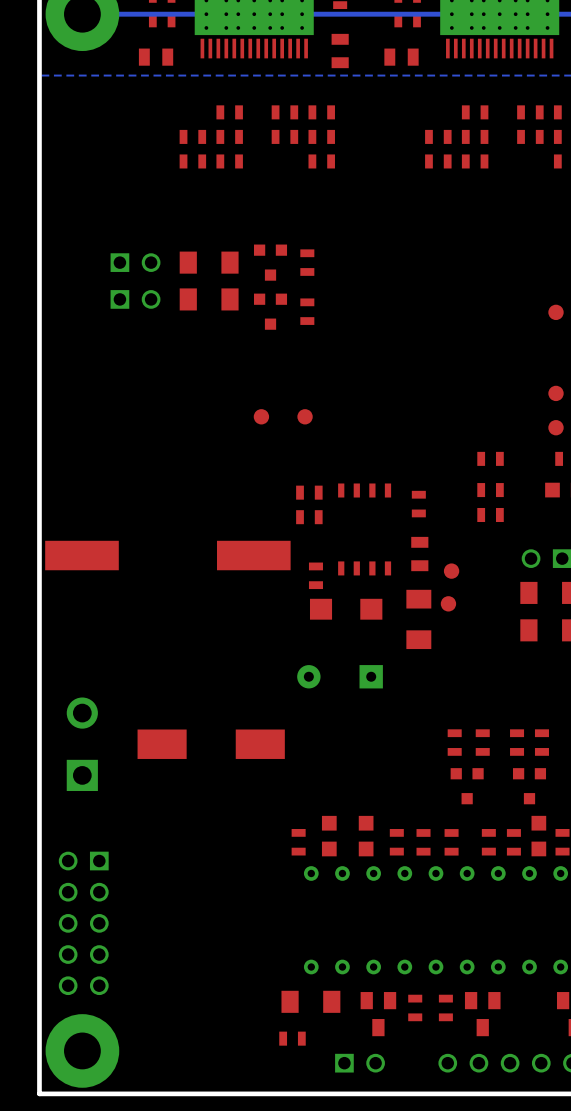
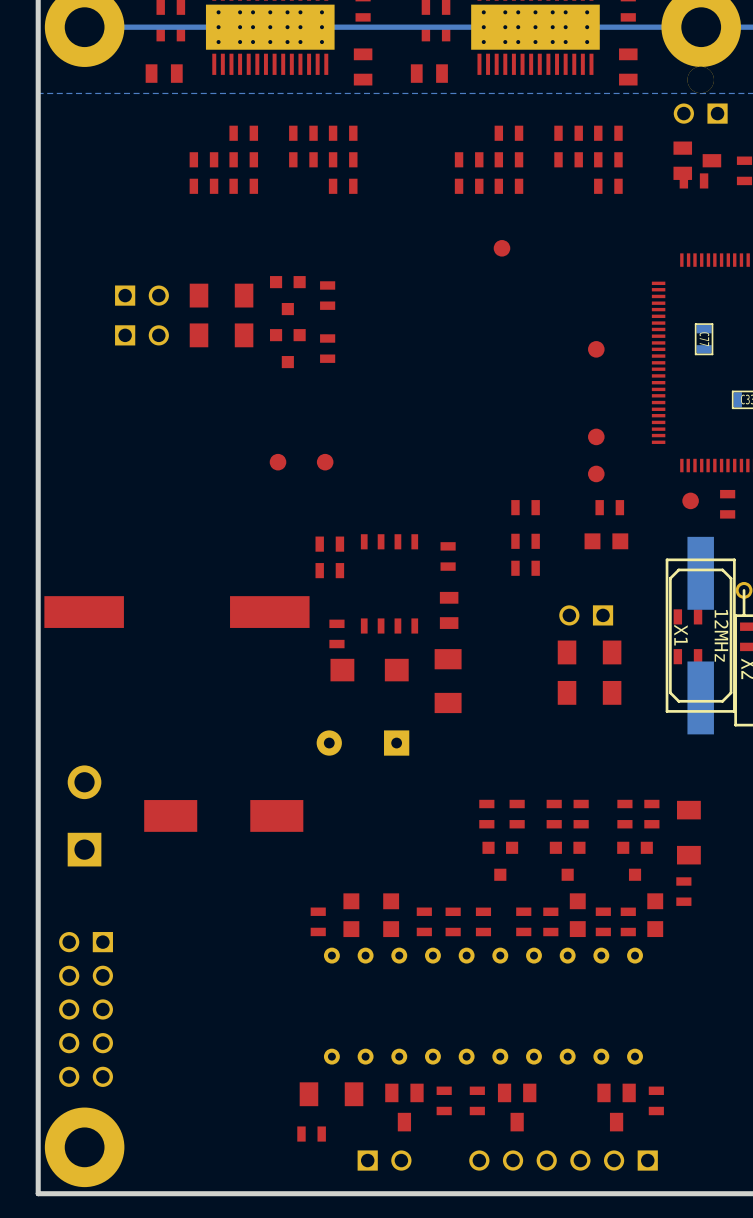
part: none -> (501, 248)
part: (451, 571) -> none
part: (448, 603) -> none

